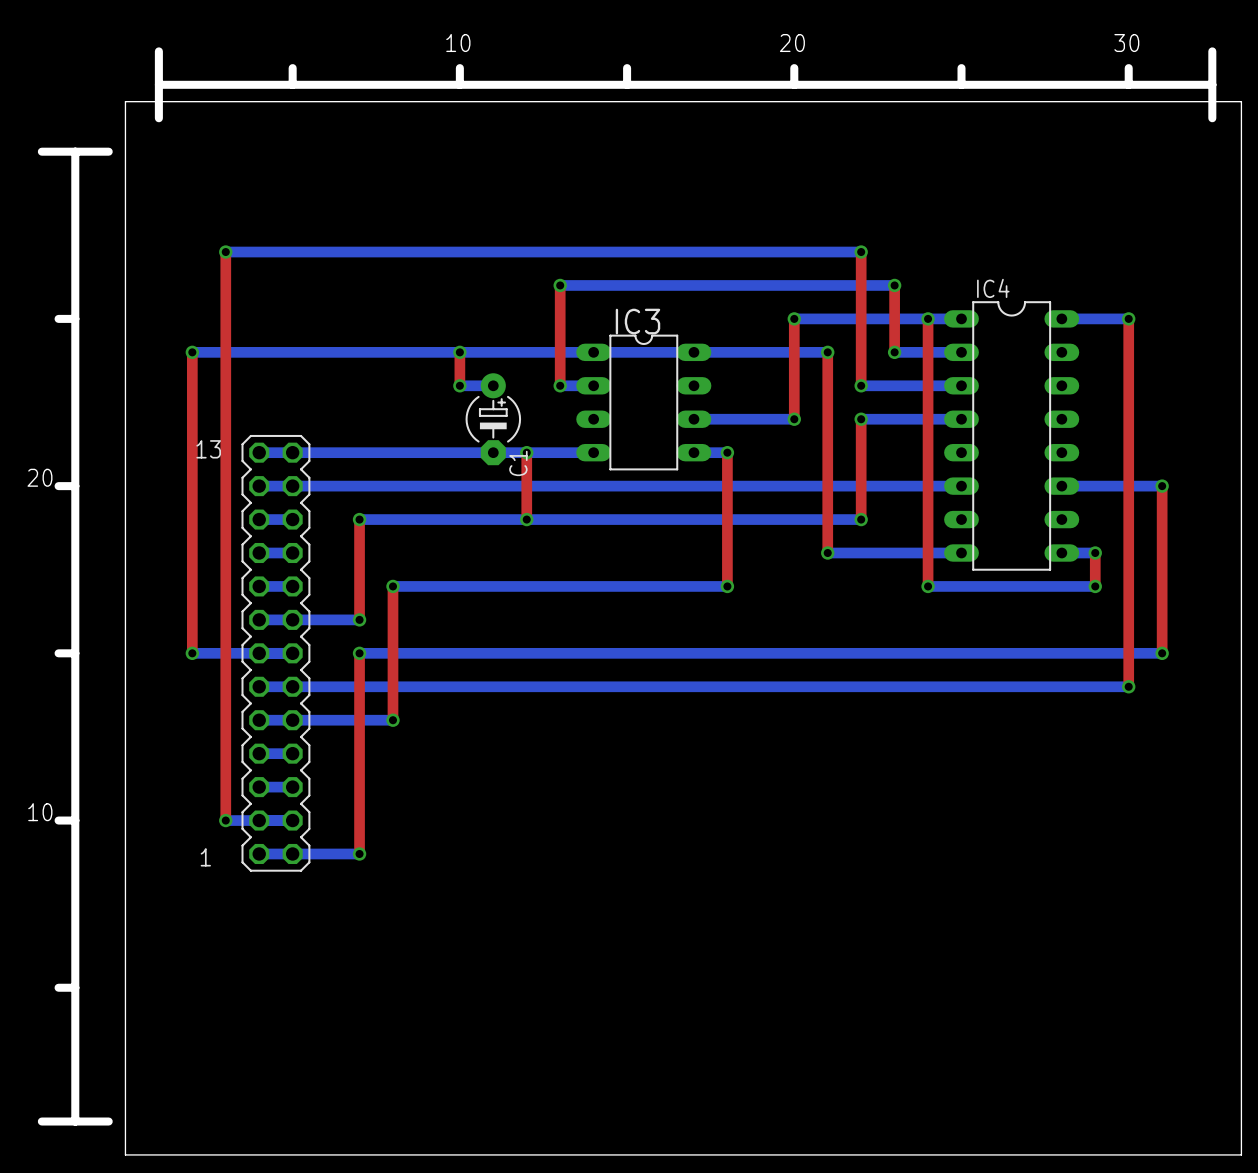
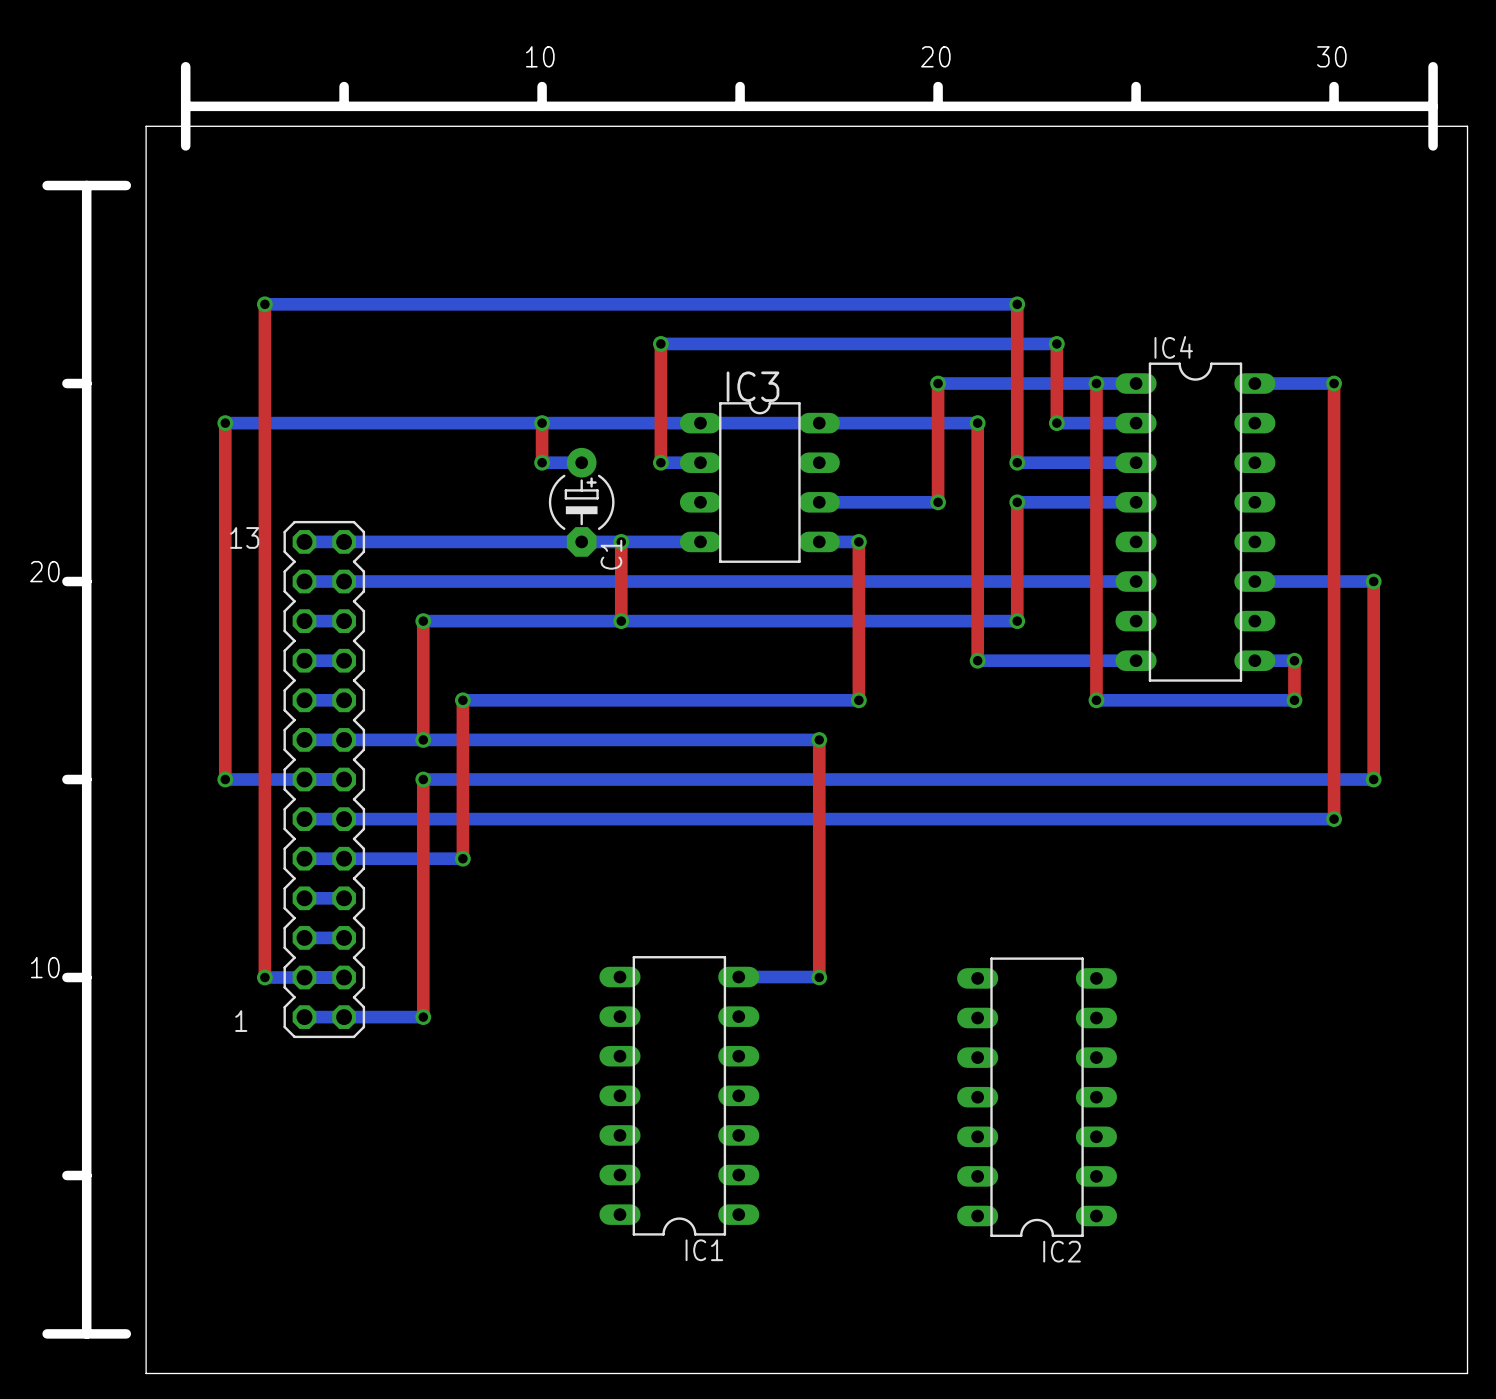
bottom track: none -> (819, 739) (423, 739) (733, 739) (733, 742)
top track: none -> (819, 739) (819, 977)
via: none -> (819, 739)
bottom track: none -> (738, 977) (819, 977)
via: none -> (819, 977)
IC1: none -> (679, 1095)
IC2: none -> (1037, 1097)

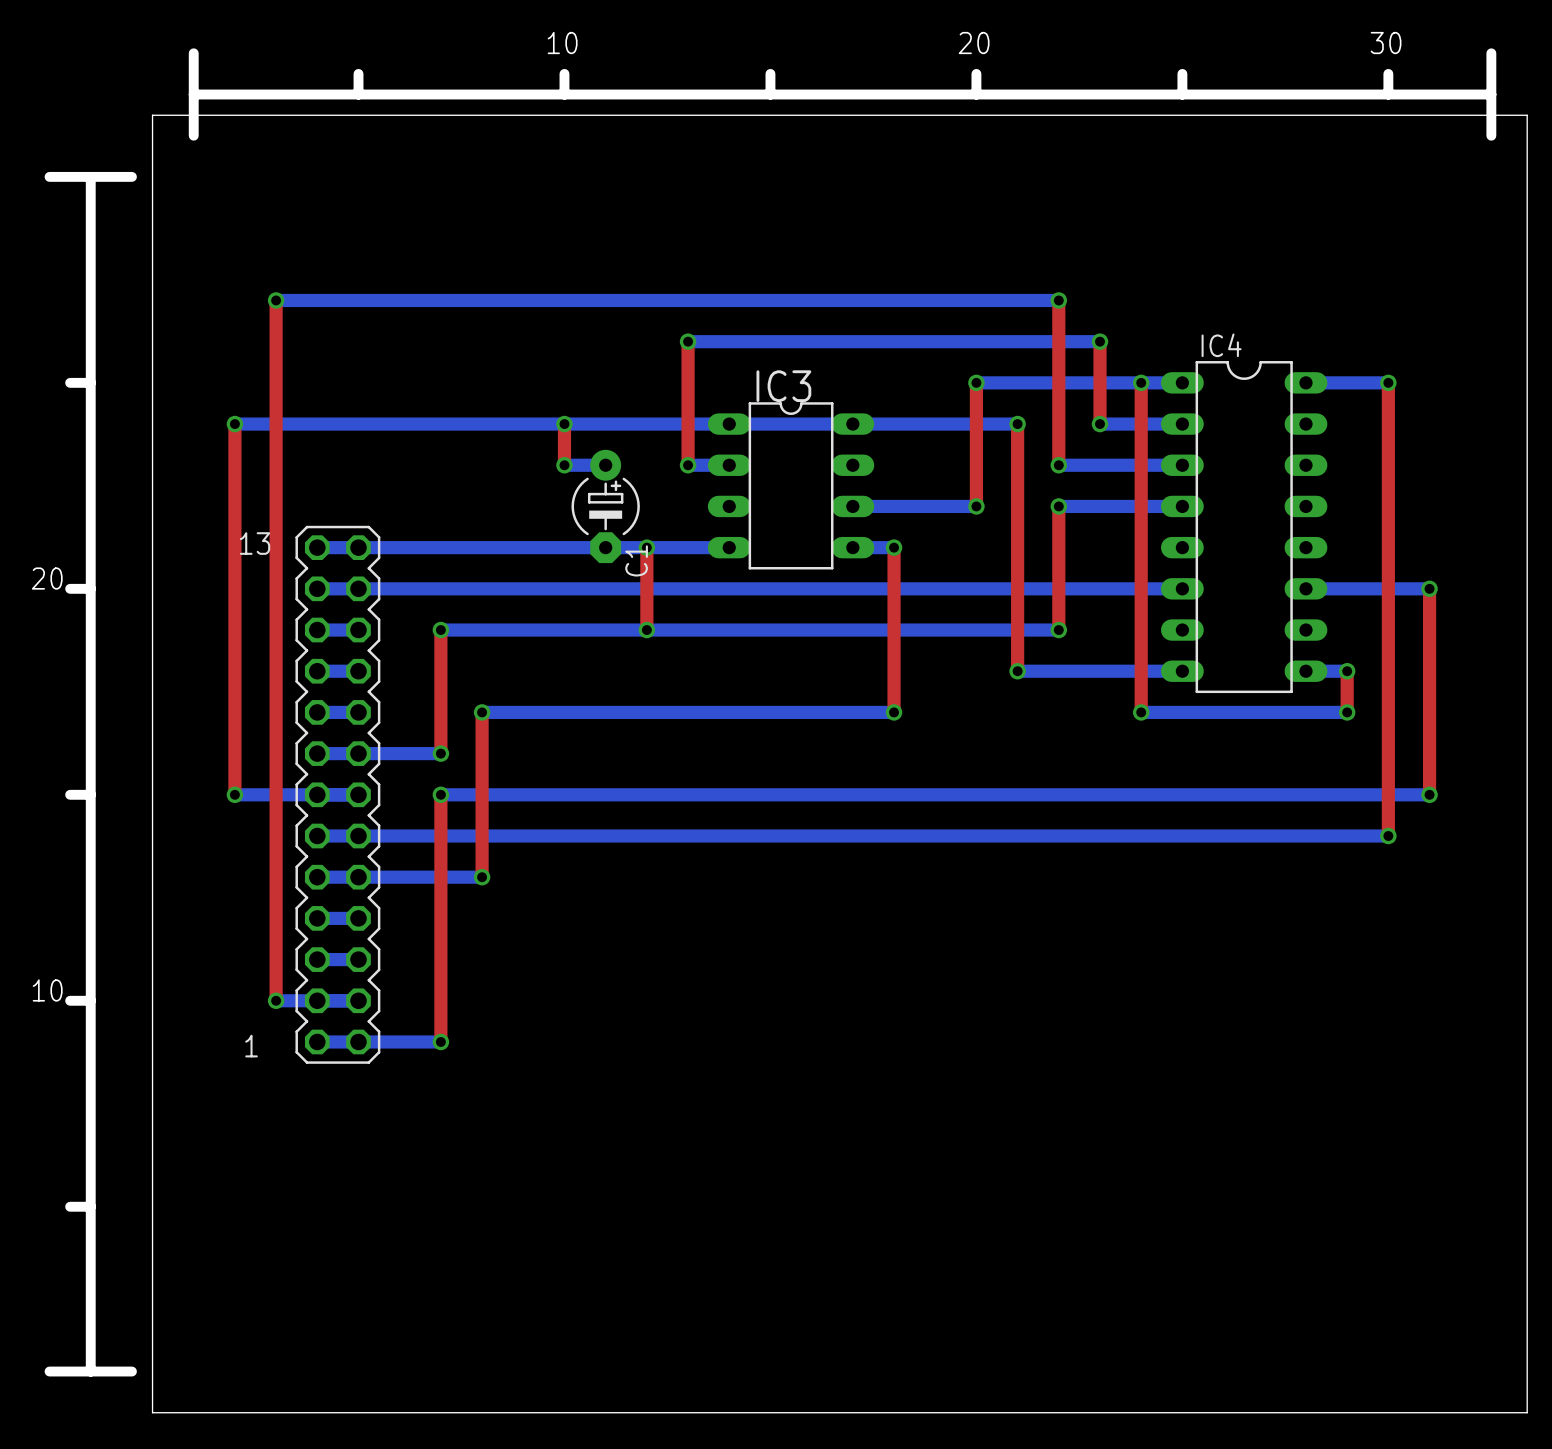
bottom track: (819, 739) (423, 739) (733, 739) (733, 742) -> none
top track: (819, 739) (819, 977) -> none
via: (819, 739) -> none
bottom track: (738, 977) (819, 977) -> none
via: (819, 977) -> none
IC1: (679, 1095) -> none
IC2: (1037, 1097) -> none

